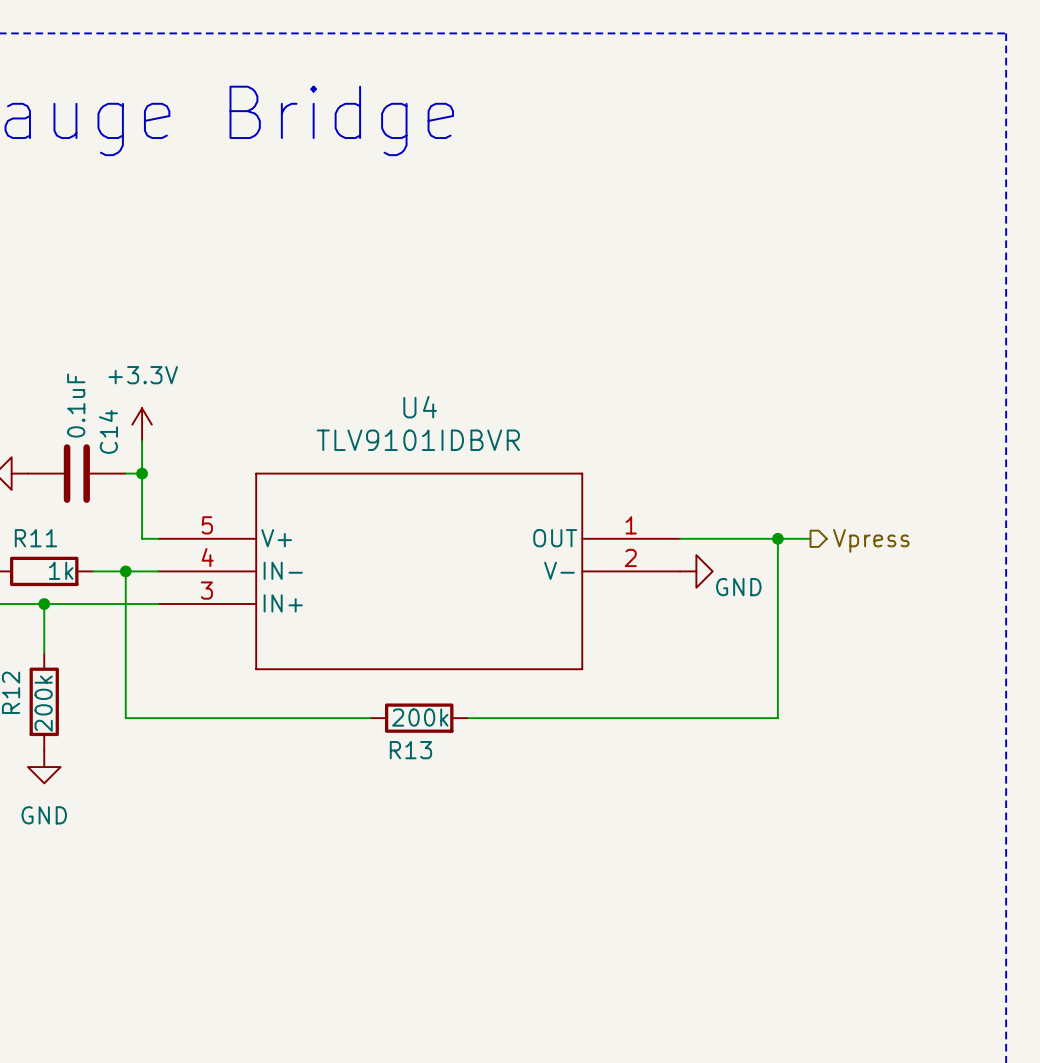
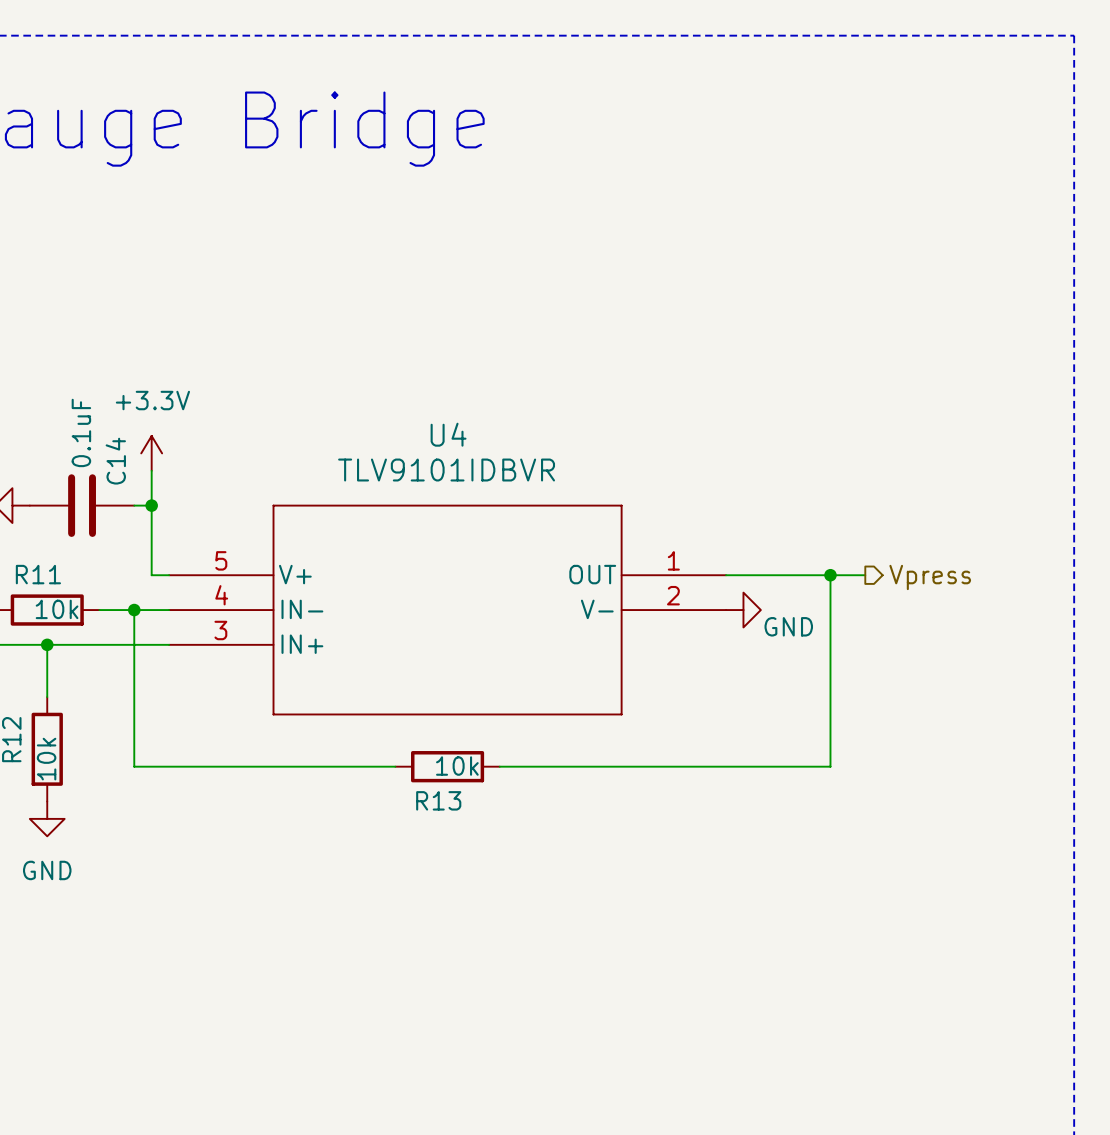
R11 value: 1k (61, 570) -> 10k (57, 609)
R12 value: 200k (43, 703) -> 10k (46, 759)
R13 value: 200k (420, 717) -> 10k (457, 766)

